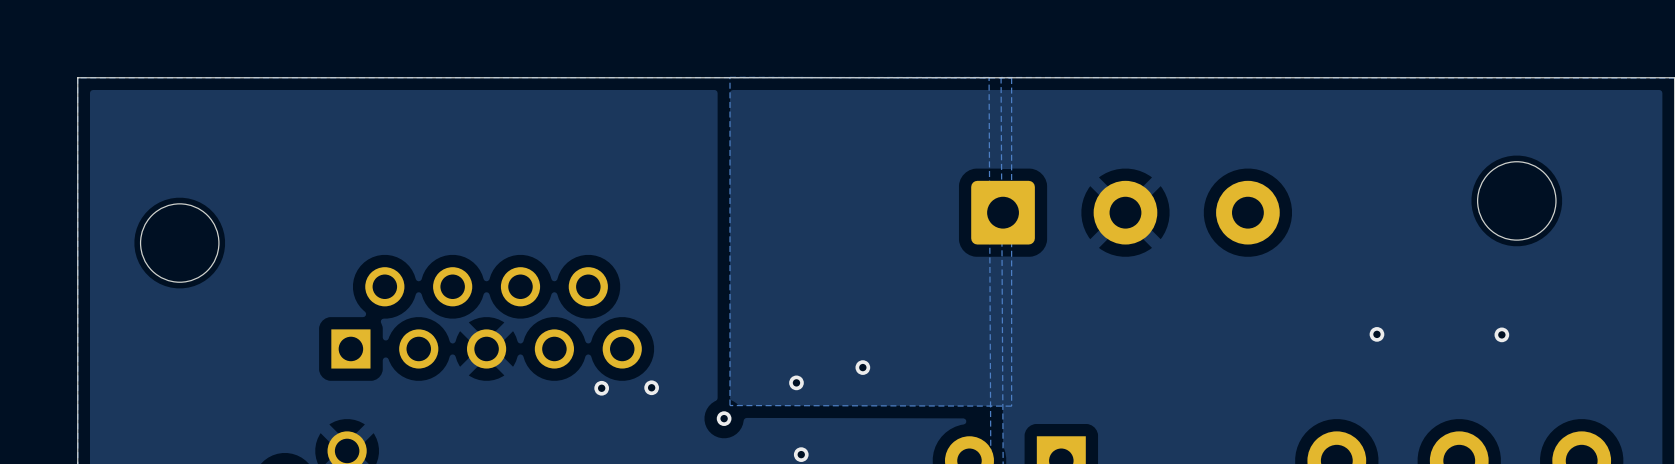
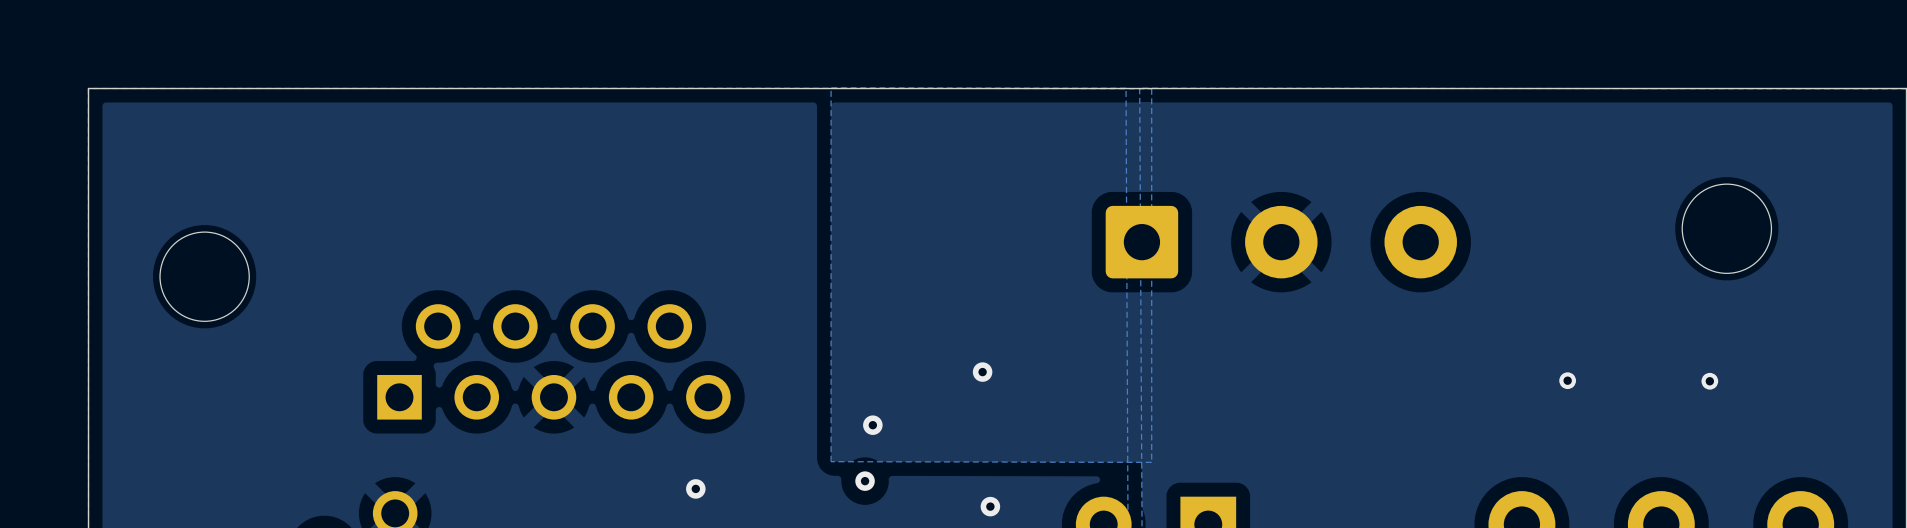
via: none -> (982, 372)
via: (862, 367) -> none
via: none -> (872, 425)
via: (796, 382) -> none
via: (651, 387) -> none
via: (601, 388) -> none
via: (724, 418) -> none
via: none -> (865, 481)
via: none -> (695, 488)
via: none -> (990, 506)
via: (801, 454) -> none

